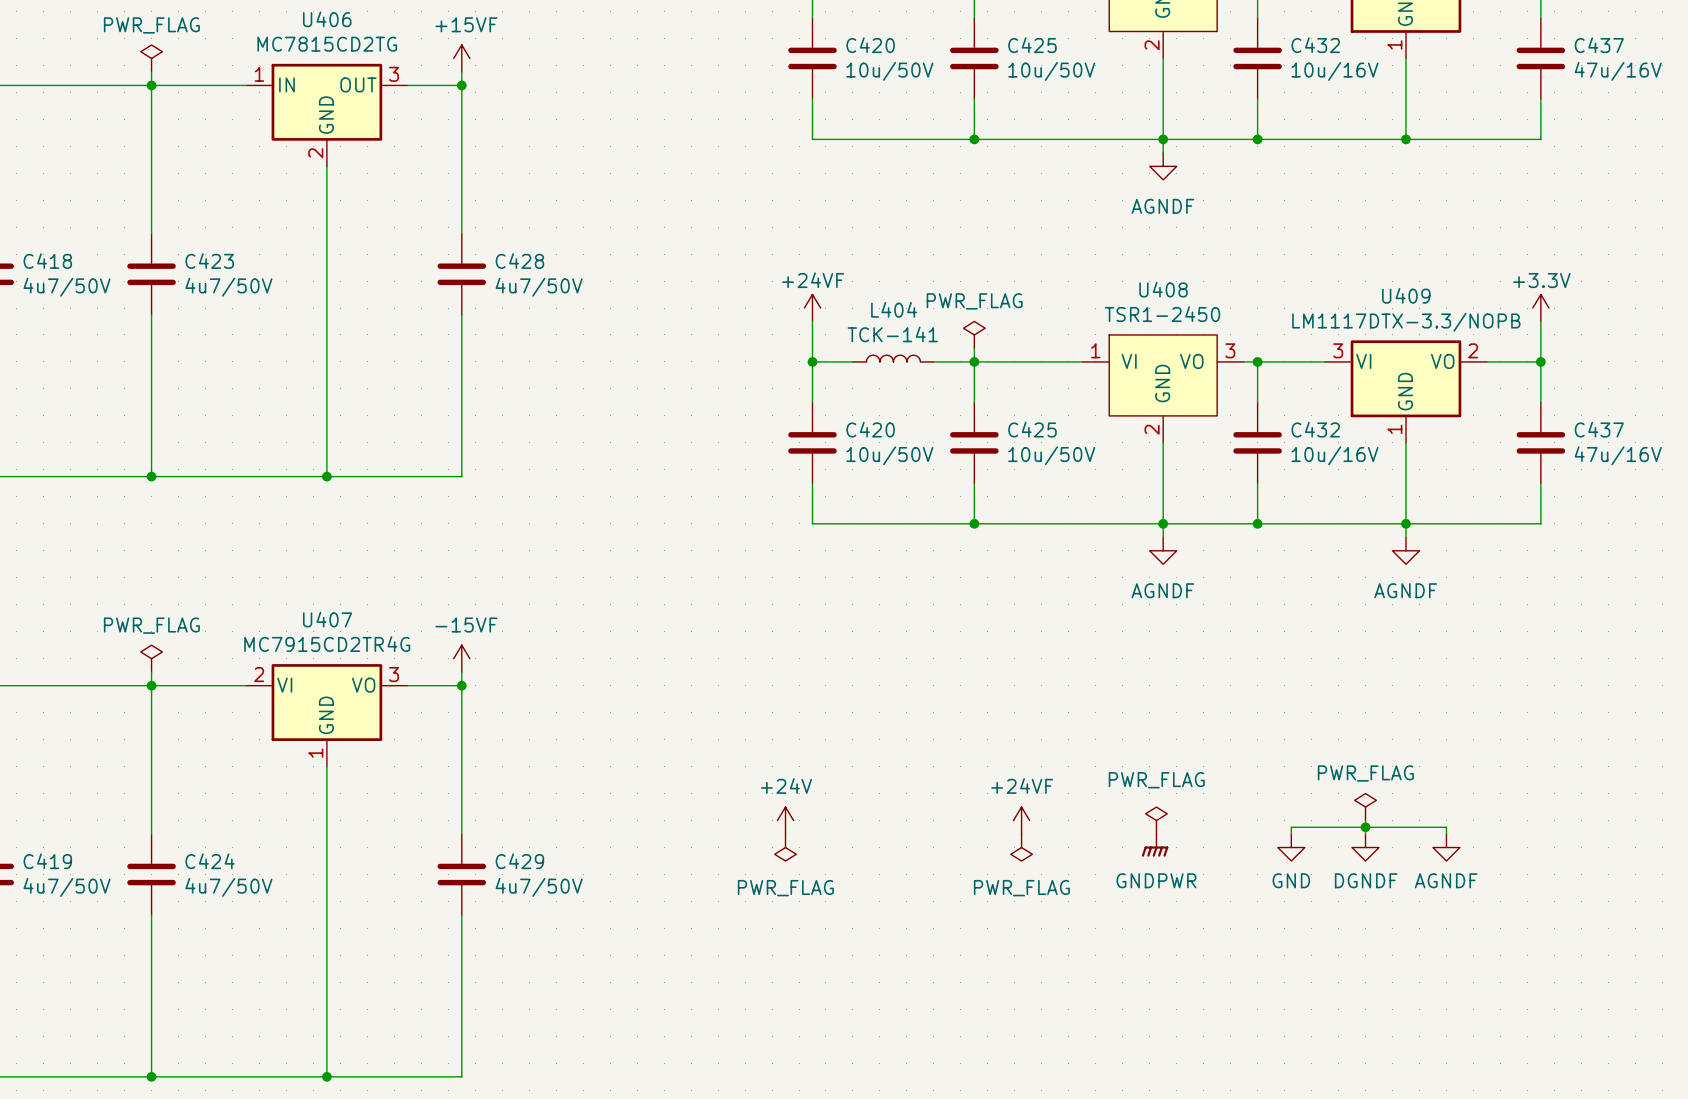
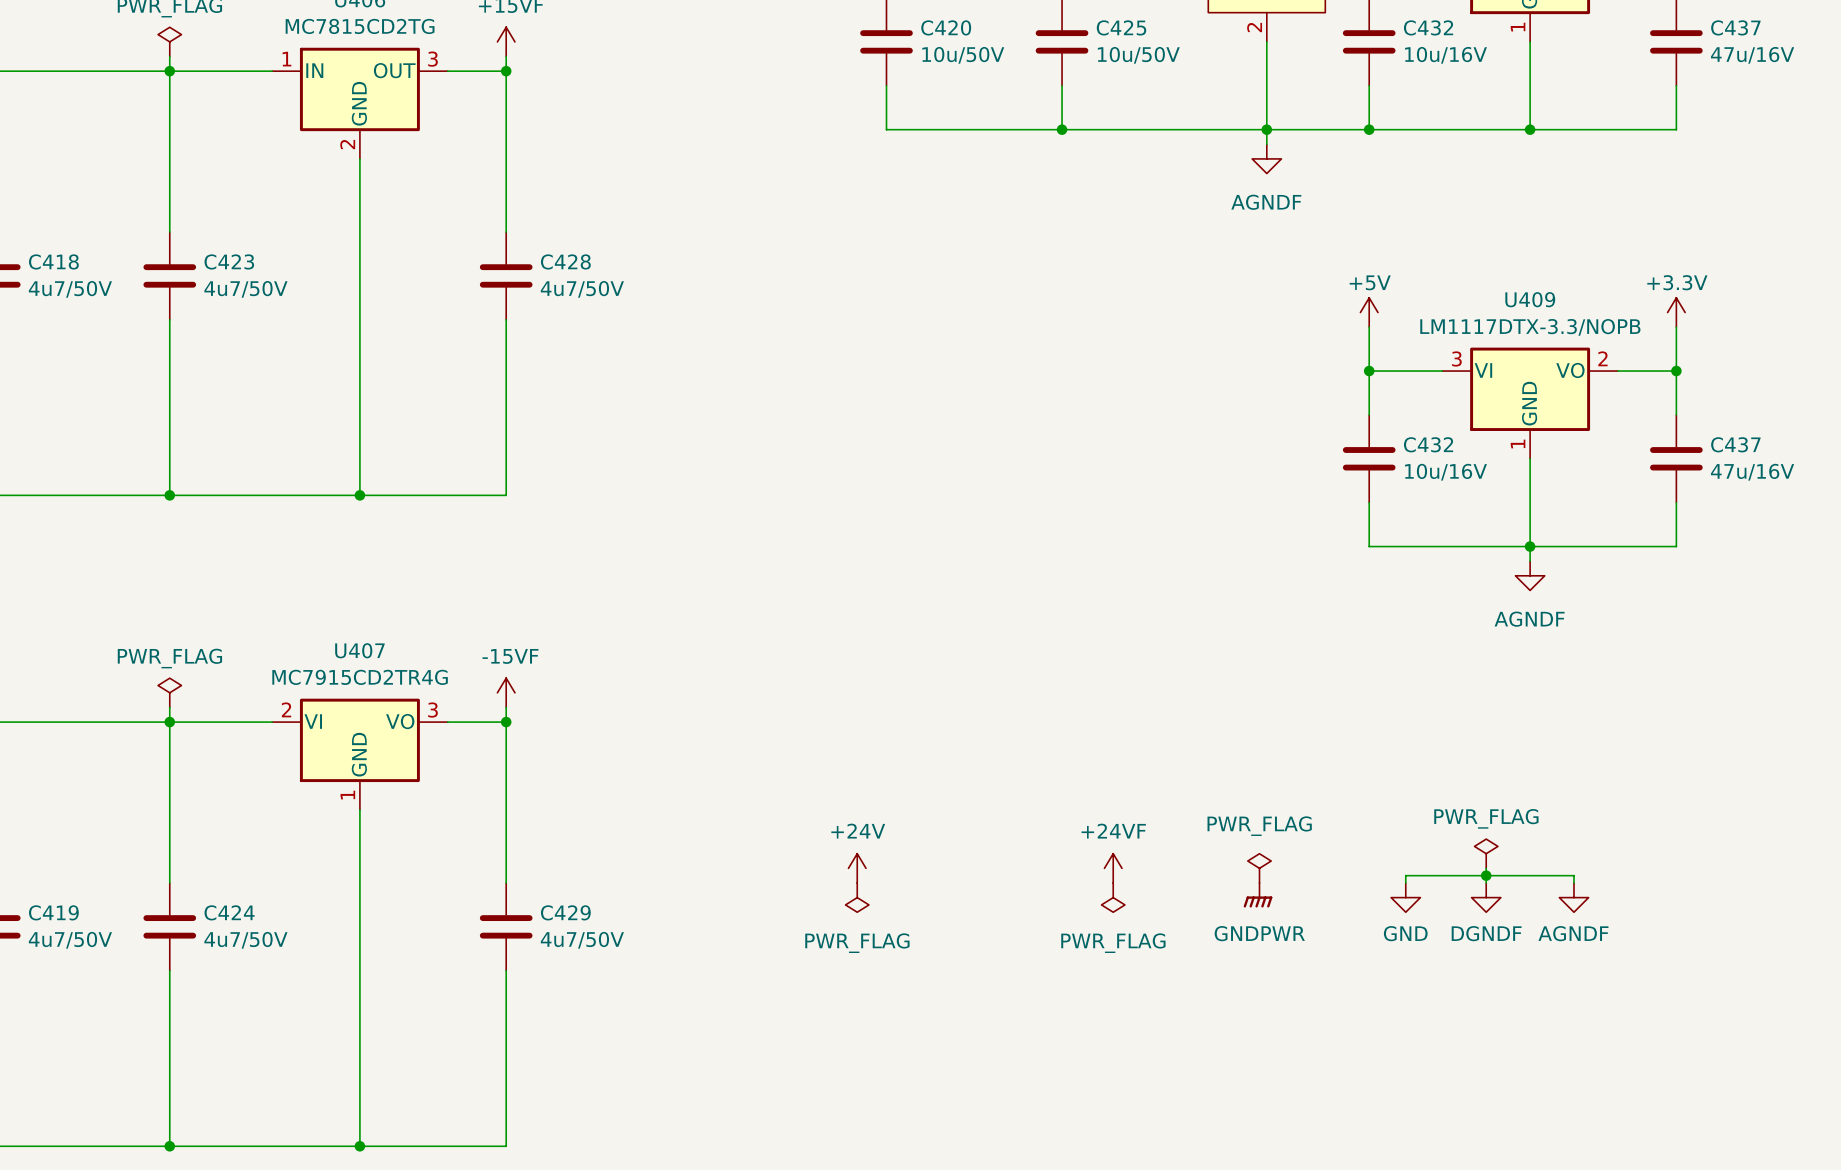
power symbol: +24VF (812, 308) -> none
power symbol: none -> +5V (1369, 312)
wire: (812, 321) (812, 402) -> none
power symbol: PWR_FLAG (974, 334) -> none
wire: (974, 348) (974, 402) -> none
L404: TCK-141 (893, 358) -> none
wire: (812, 361) (852, 361) -> none
junction: (812, 361) -> none
wire: (933, 361) (1082, 361) -> none
junction: (974, 361) -> none
wire: (1244, 361) (1257, 361) -> (1369, 327) (1369, 371)
U408: TSR1-2450 (1163, 388) -> none
C420: 10u/50V (812, 442) -> none
C425: 10u/50V (974, 442) -> none
wire: (1163, 442) (1163, 537) -> none
wire: (812, 483) (812, 523) (1257, 523) -> none
wire: (974, 483) (974, 523) -> none
junction: (974, 523) -> none
junction: (1163, 523) -> none
junction: (1257, 523) -> none
power symbol: AGNDF (1163, 550) -> none

